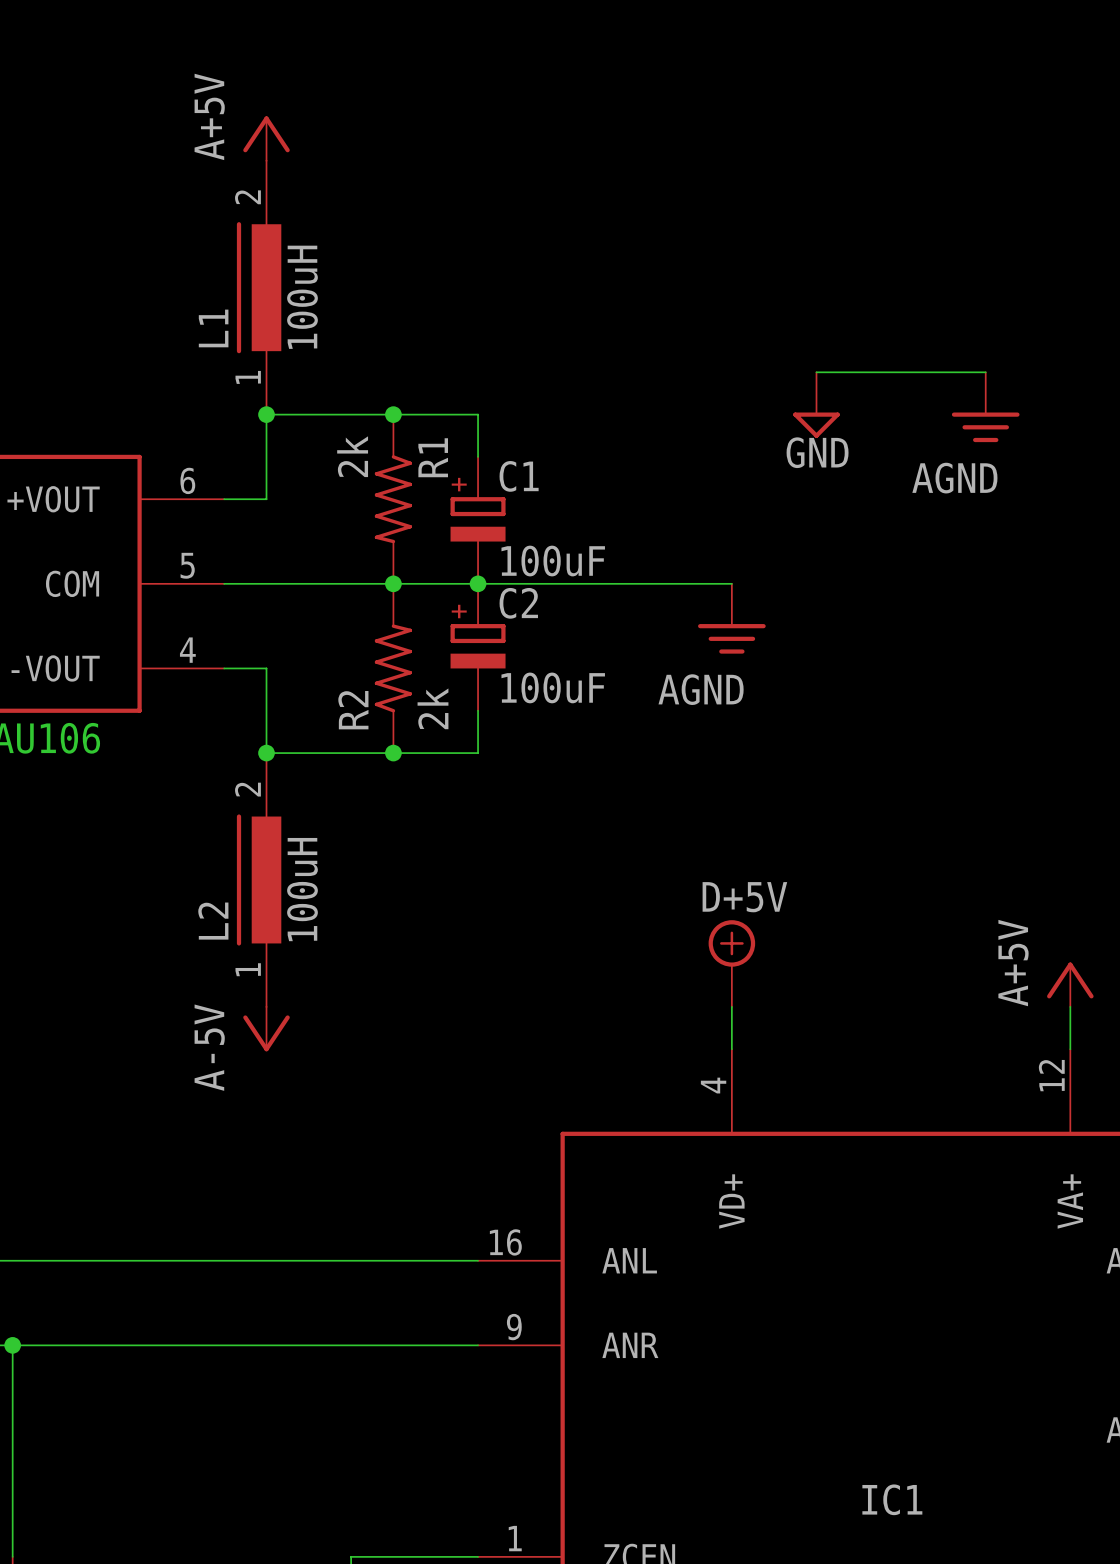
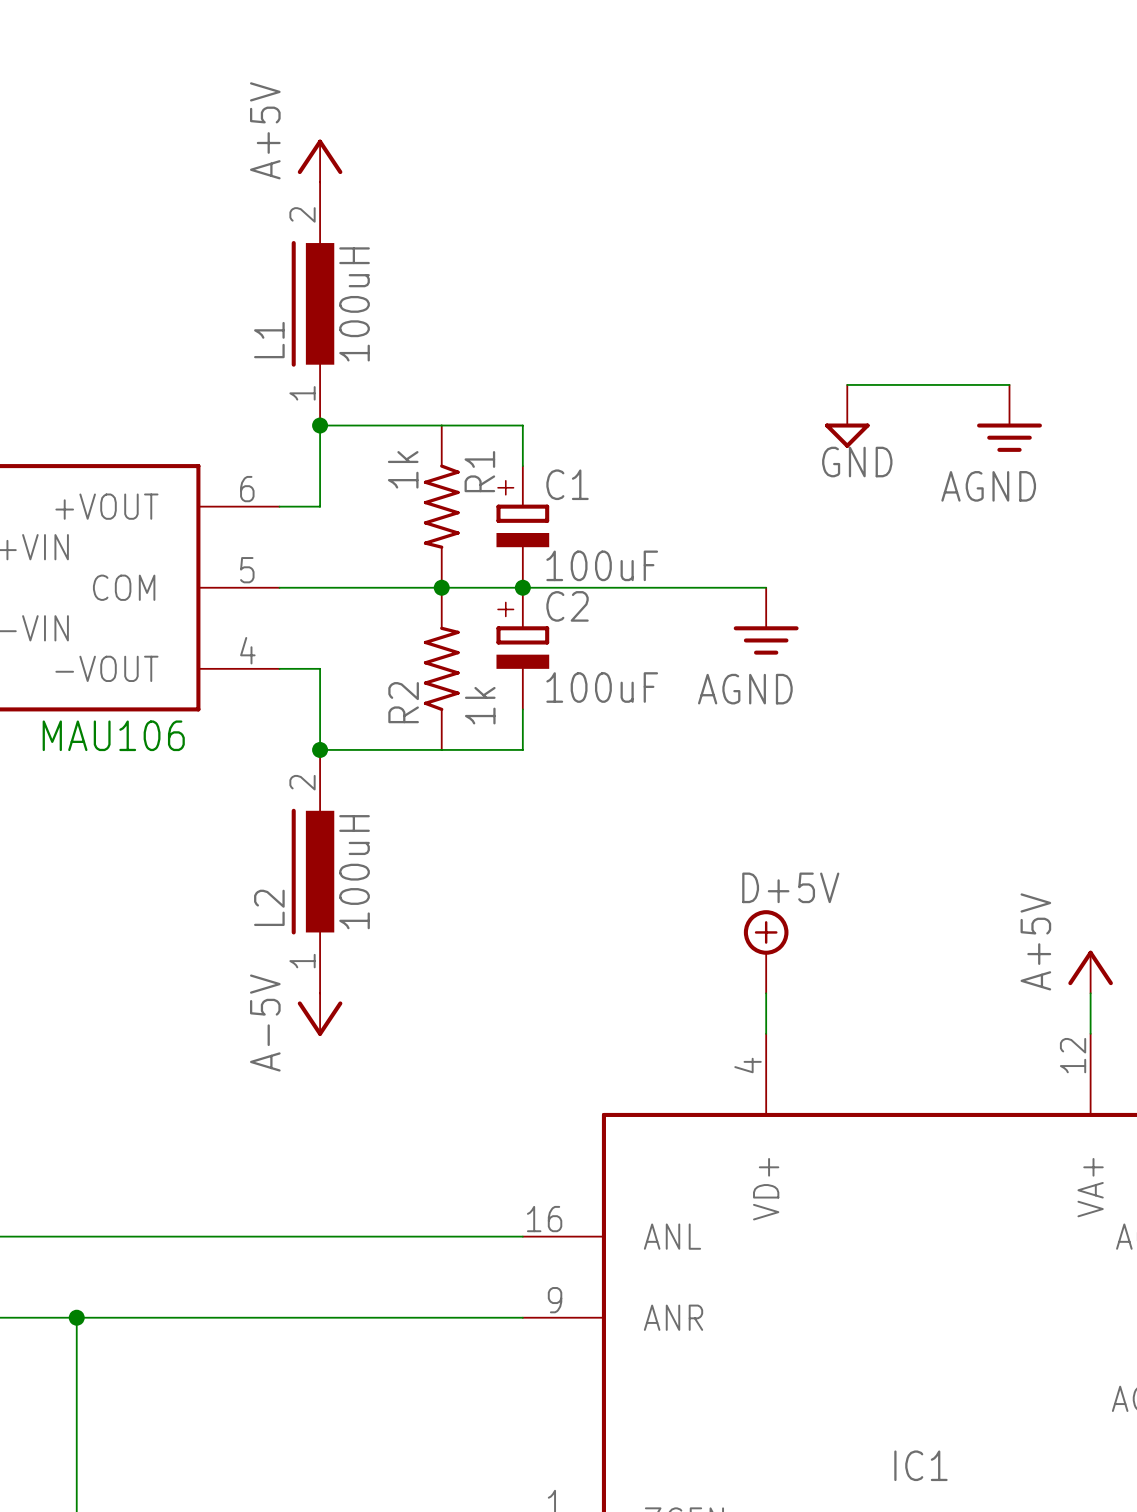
junction: (393, 414) -> none
R1 value: 2k (352, 456) -> 1k (403, 469)
R2 value: 2k (432, 708) -> 1k (480, 705)
junction: (393, 753) -> none

